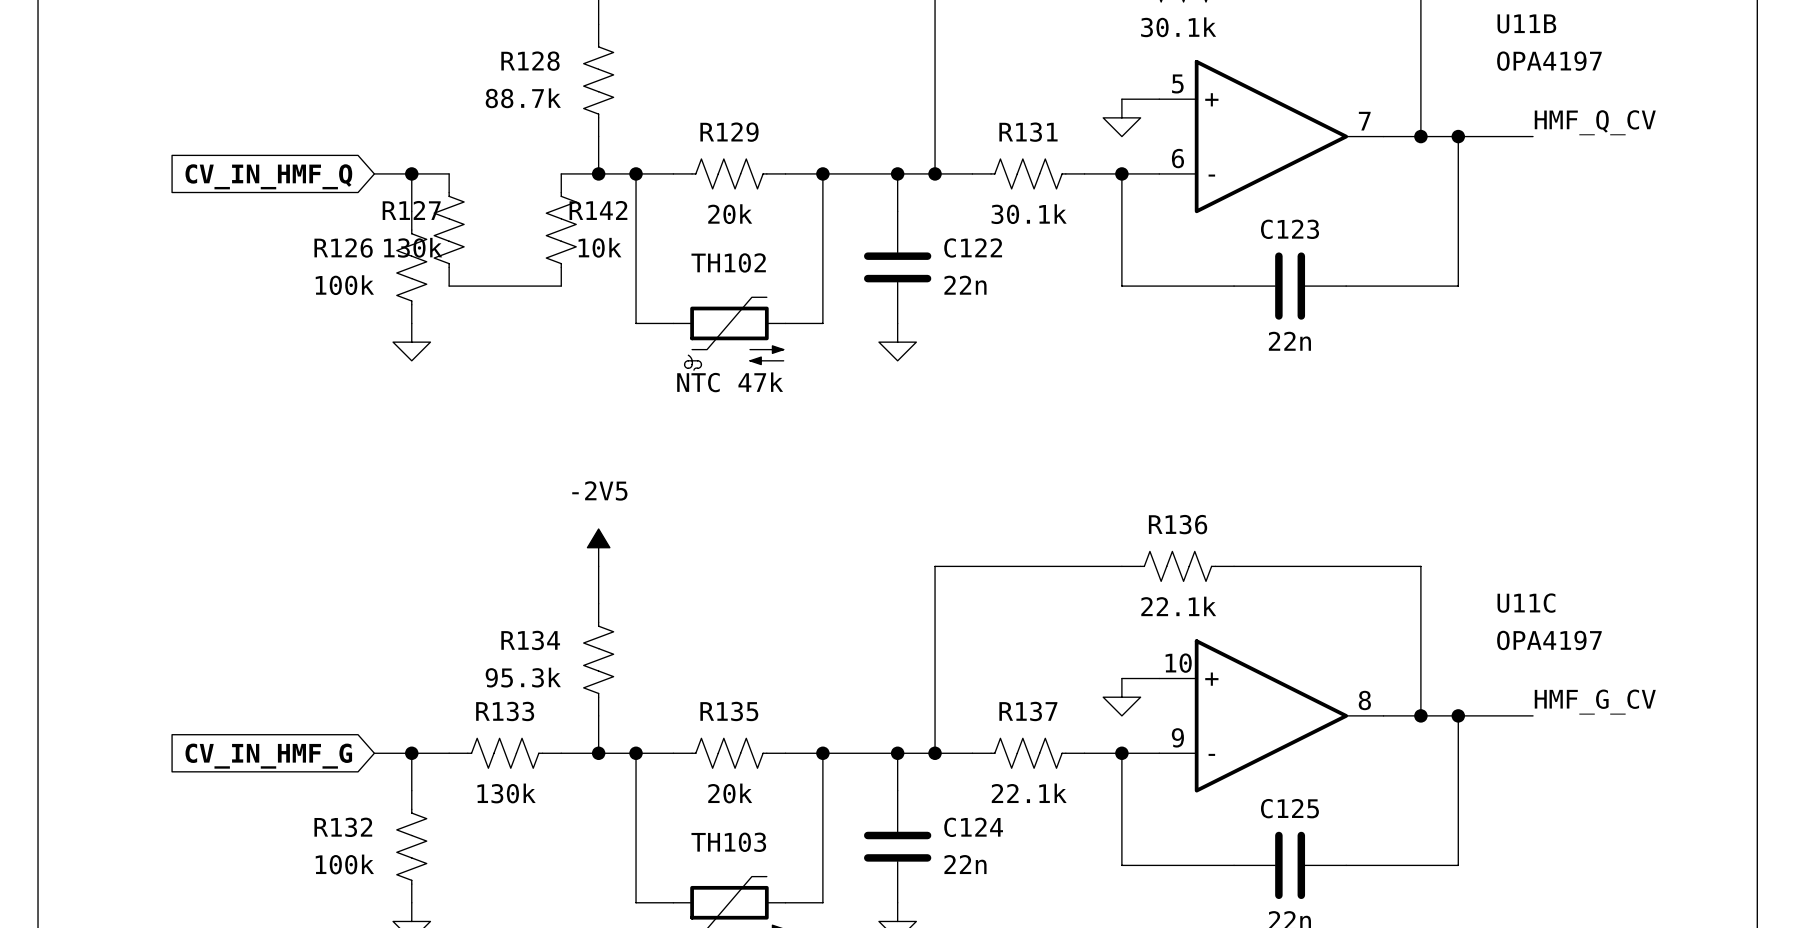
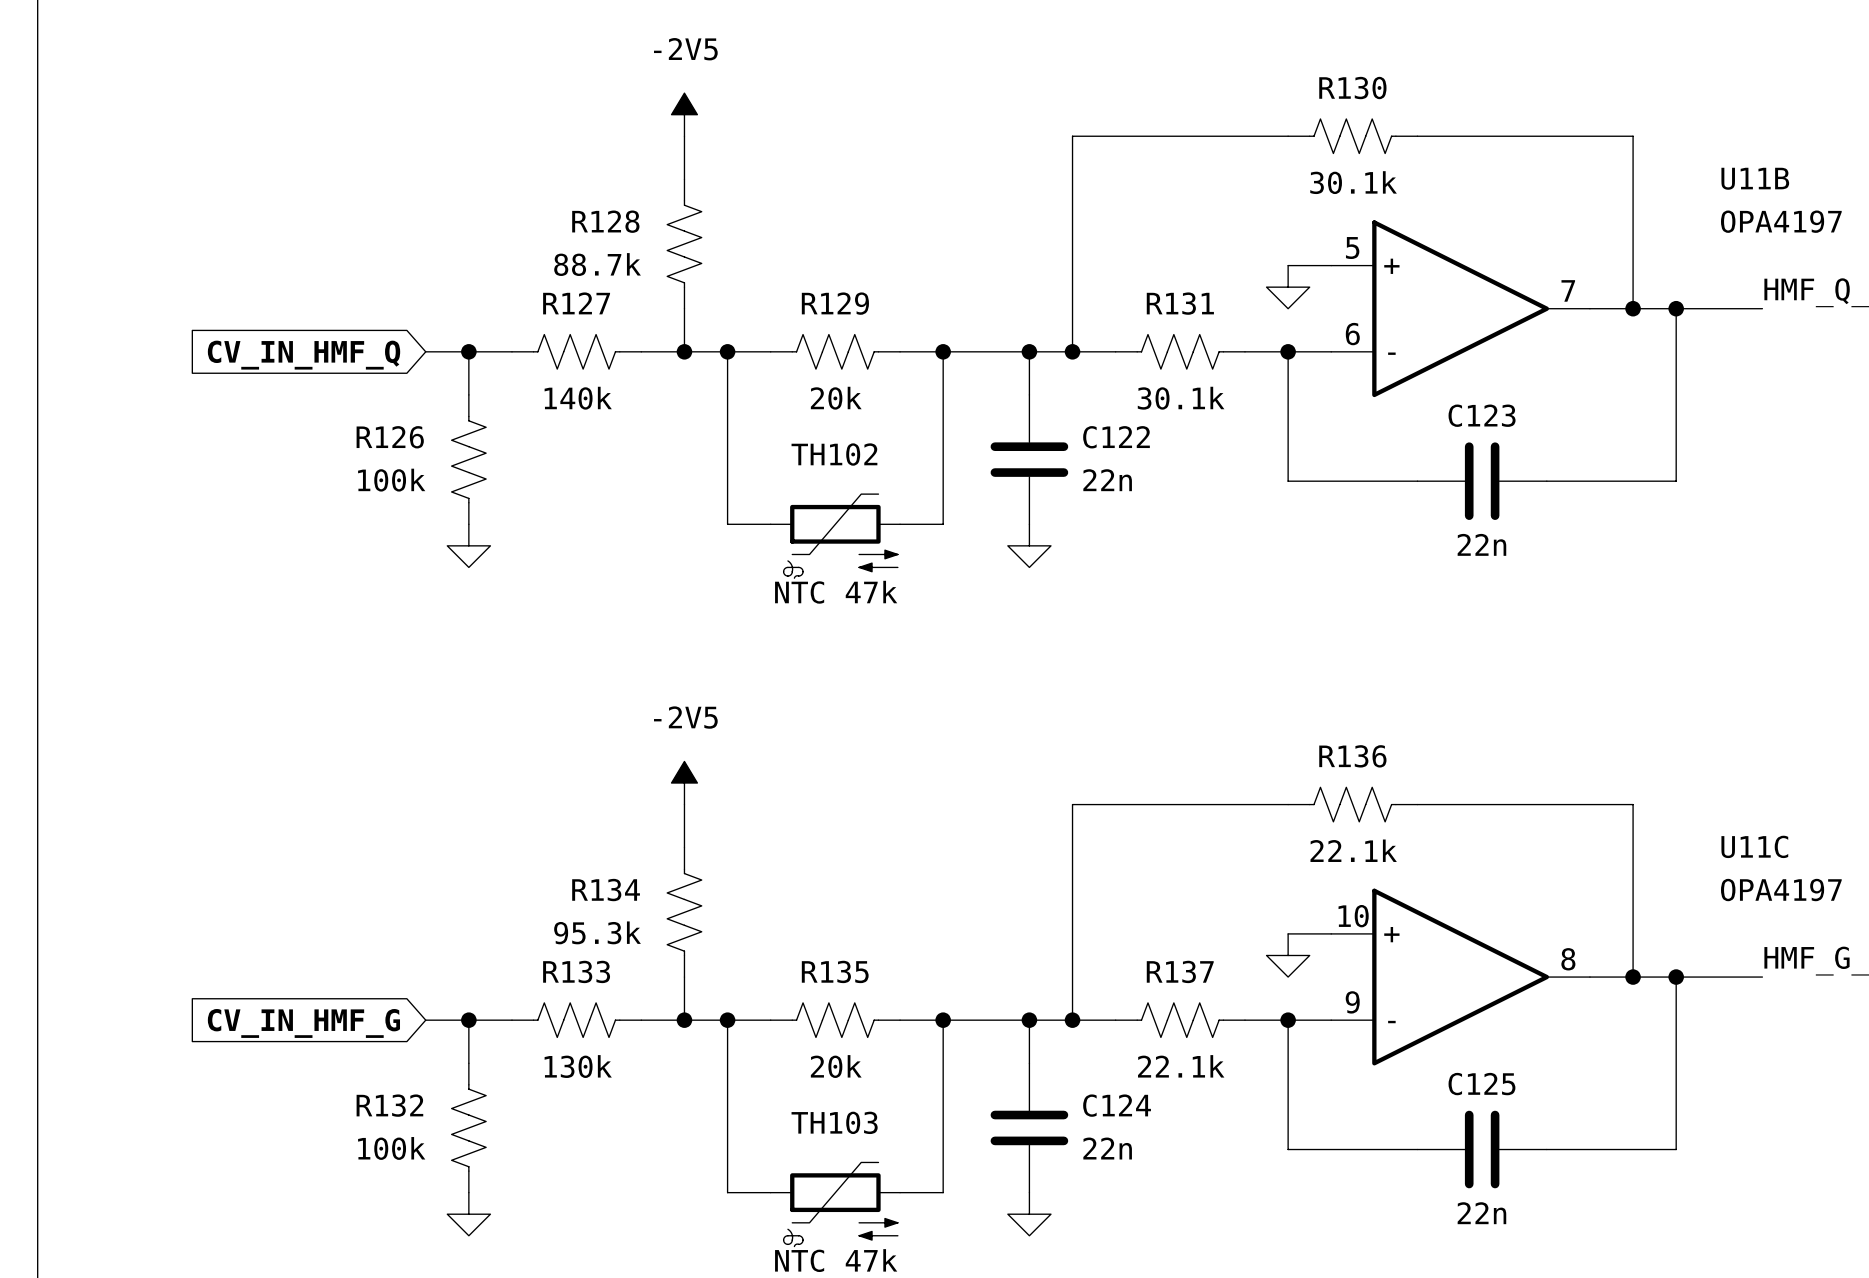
R127 rotation: 0° (449, 230) -> 90° clockwise (576, 351)
R127 position: (449, 230) -> (576, 351)
R142: 10k (561, 230) -> none
R127 value: 130k (413, 247) -> 140k (578, 398)
wire: (449, 286) (561, 286) -> none

